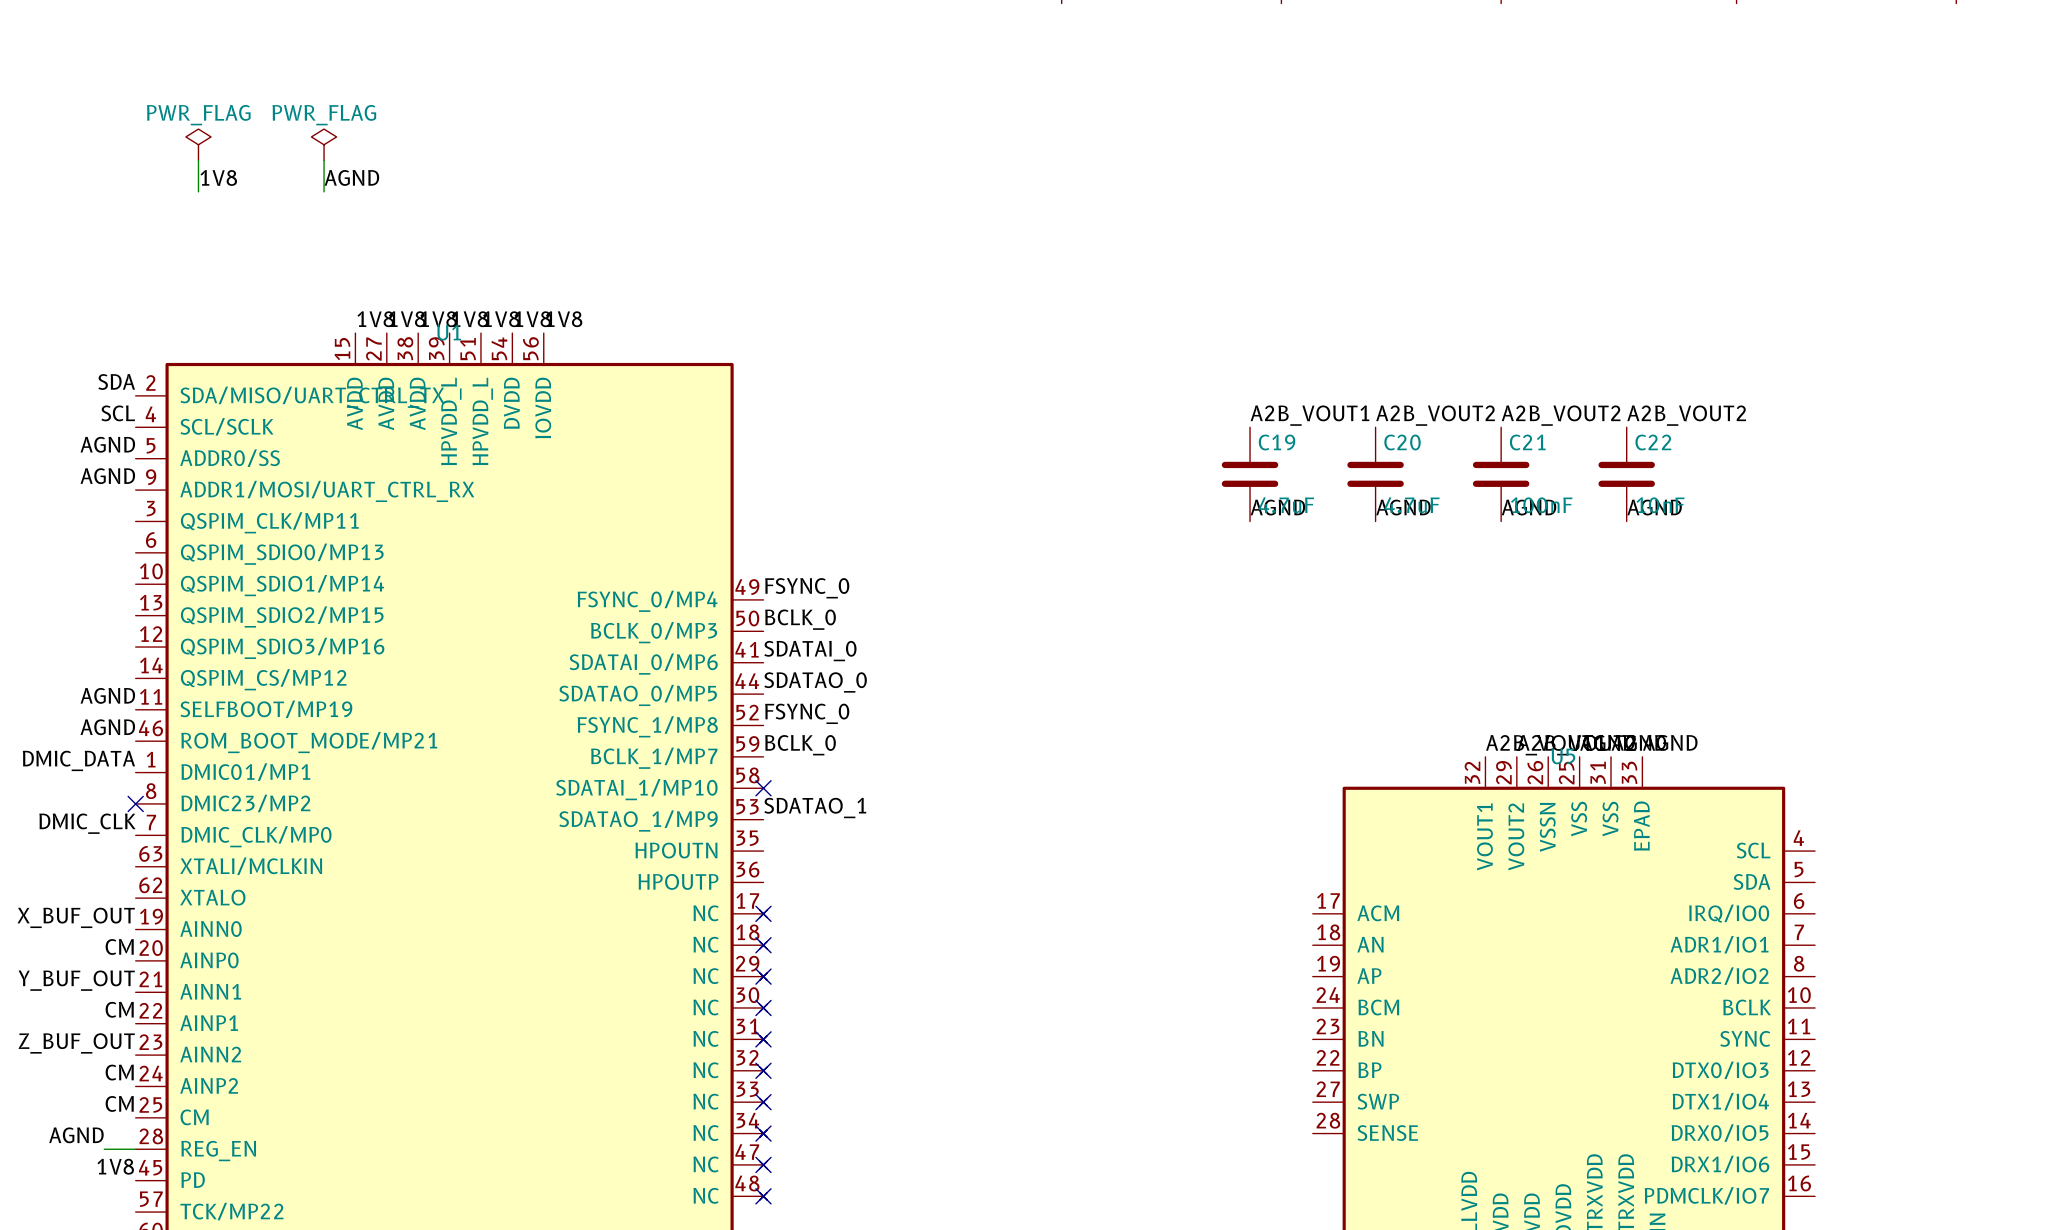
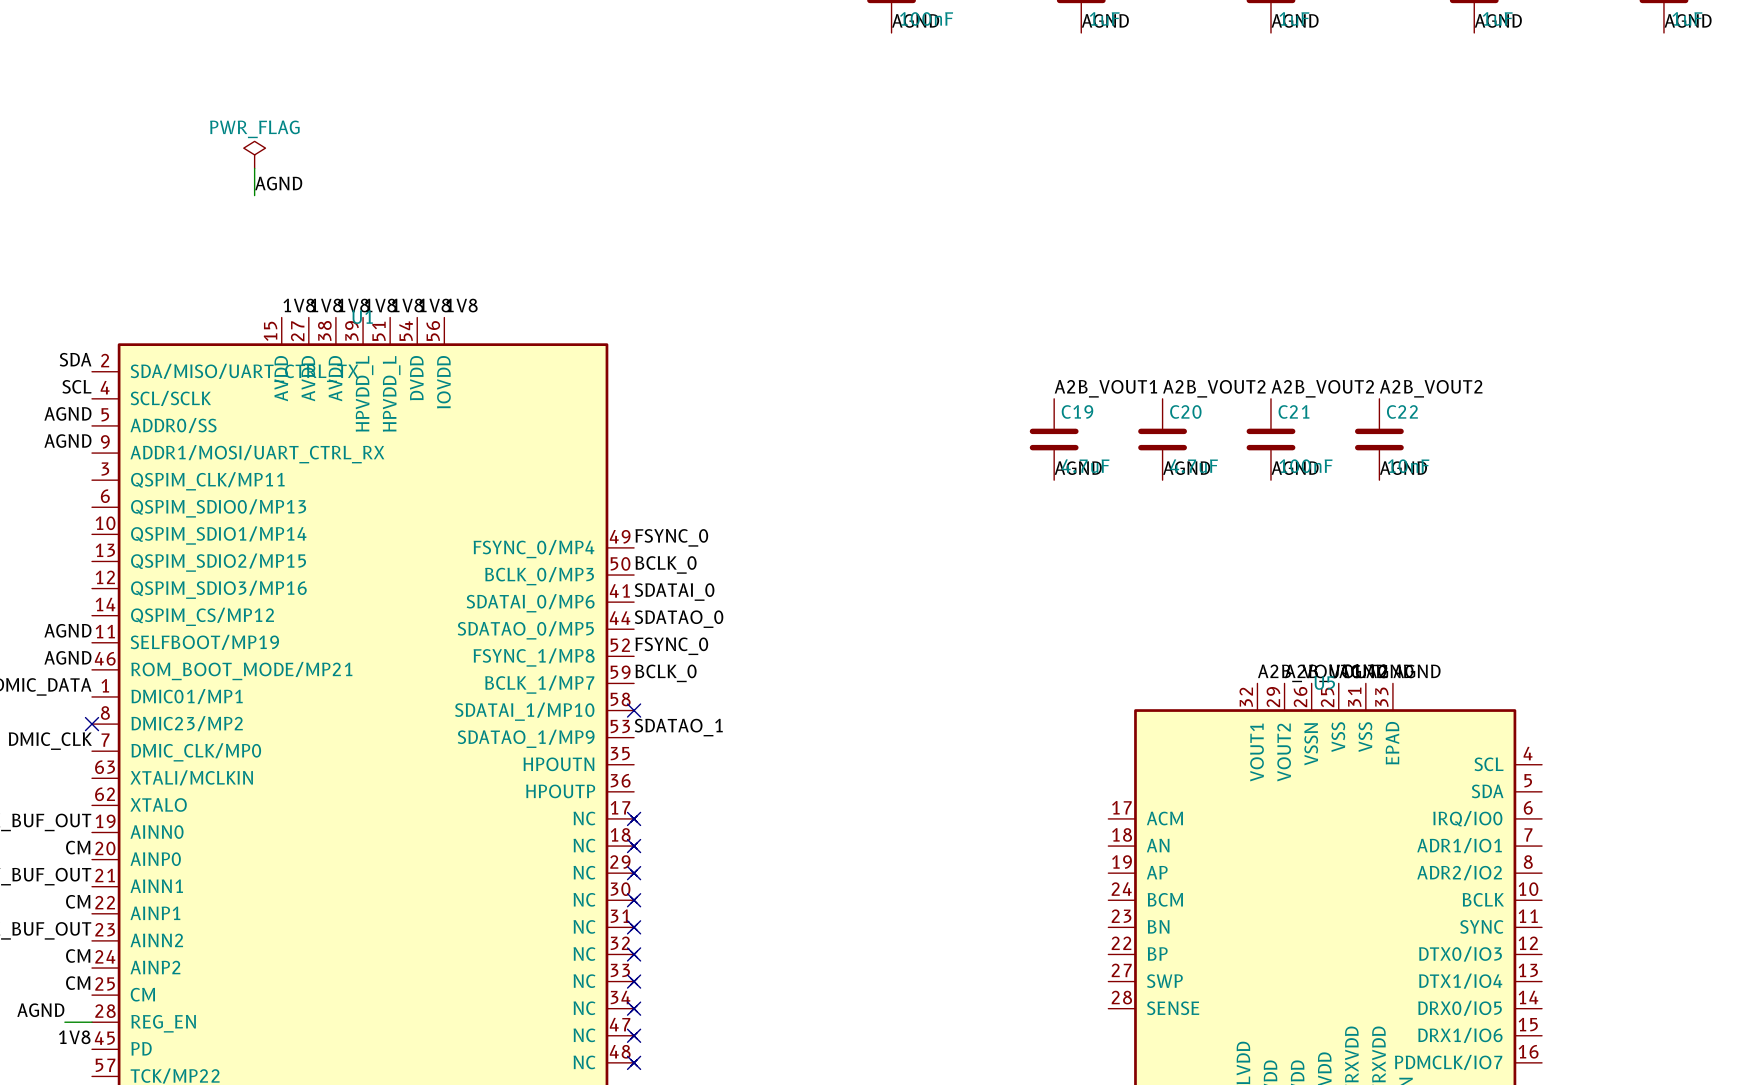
power symbol: PWR_FLAG (198, 144) -> none
wire: (198, 160) (198, 191) -> none
label: 1V8 (218, 177) -> none

